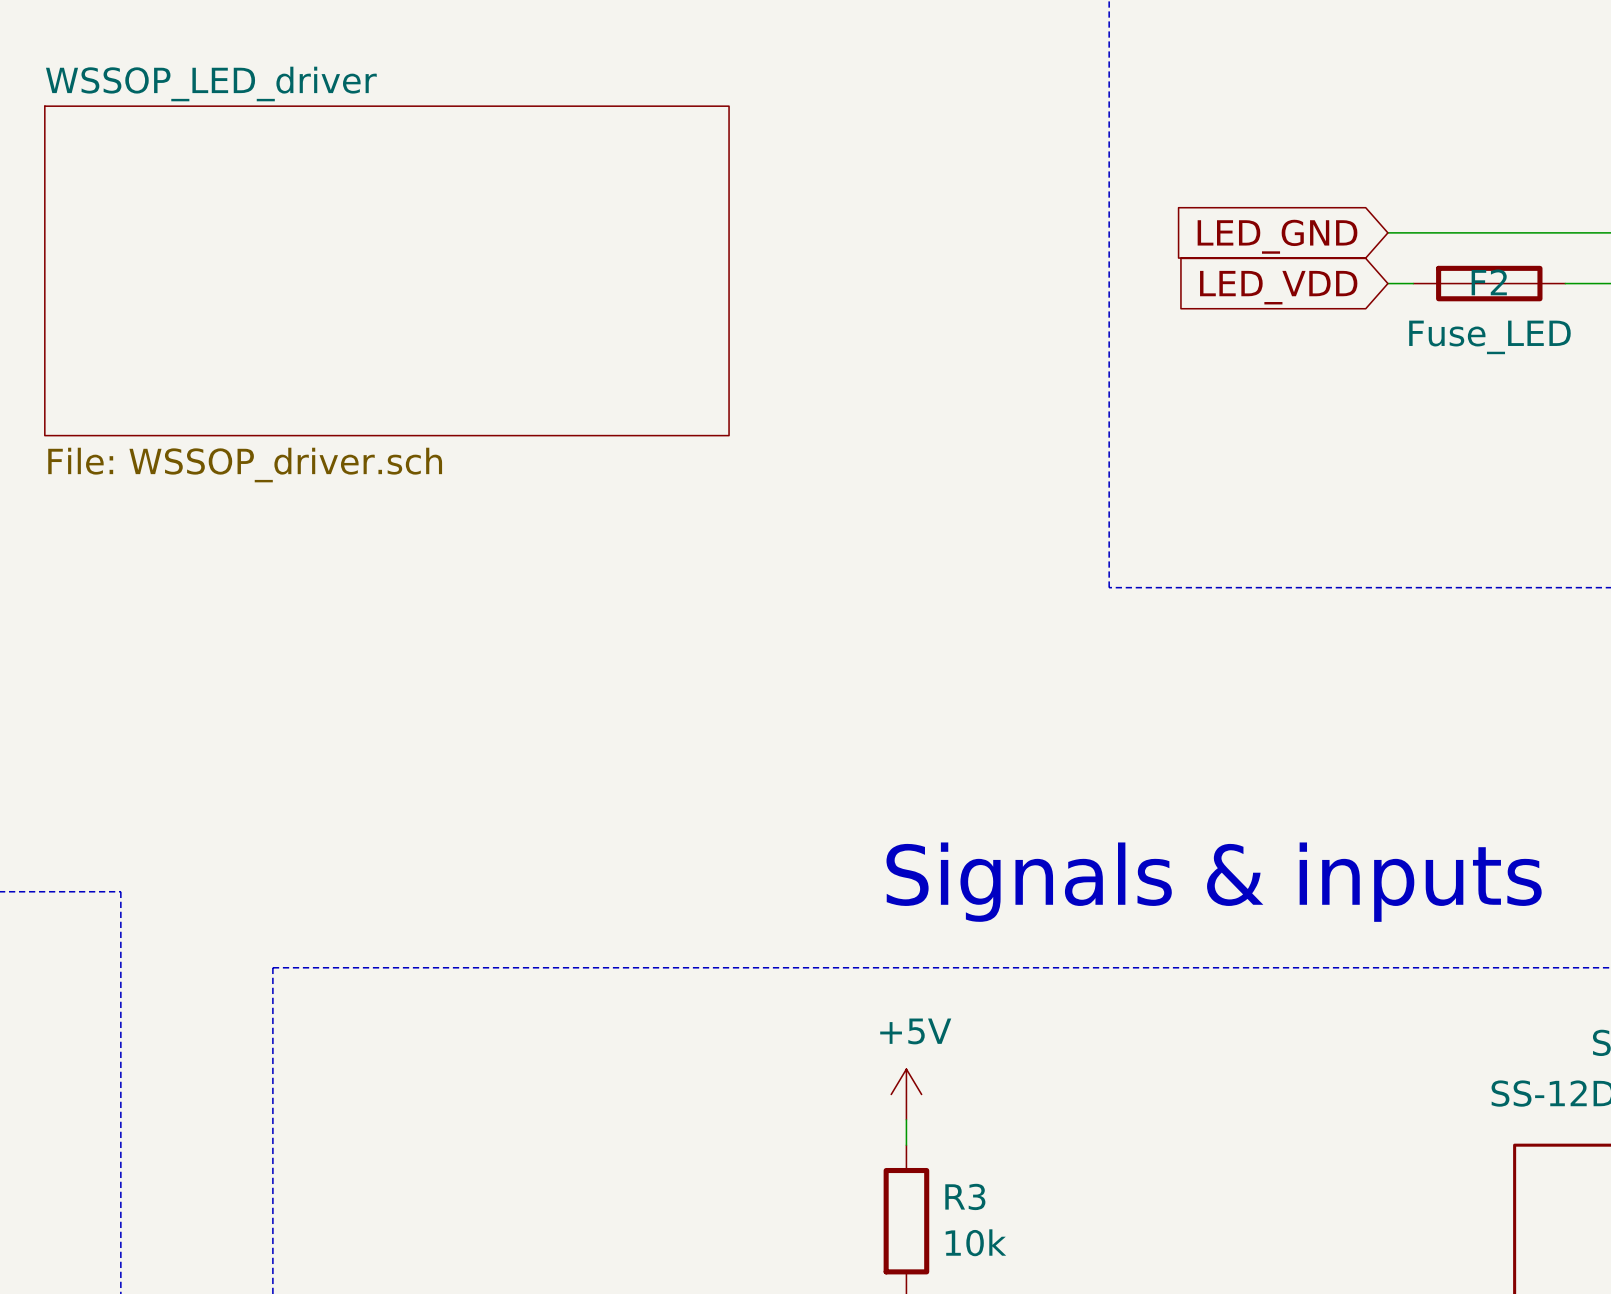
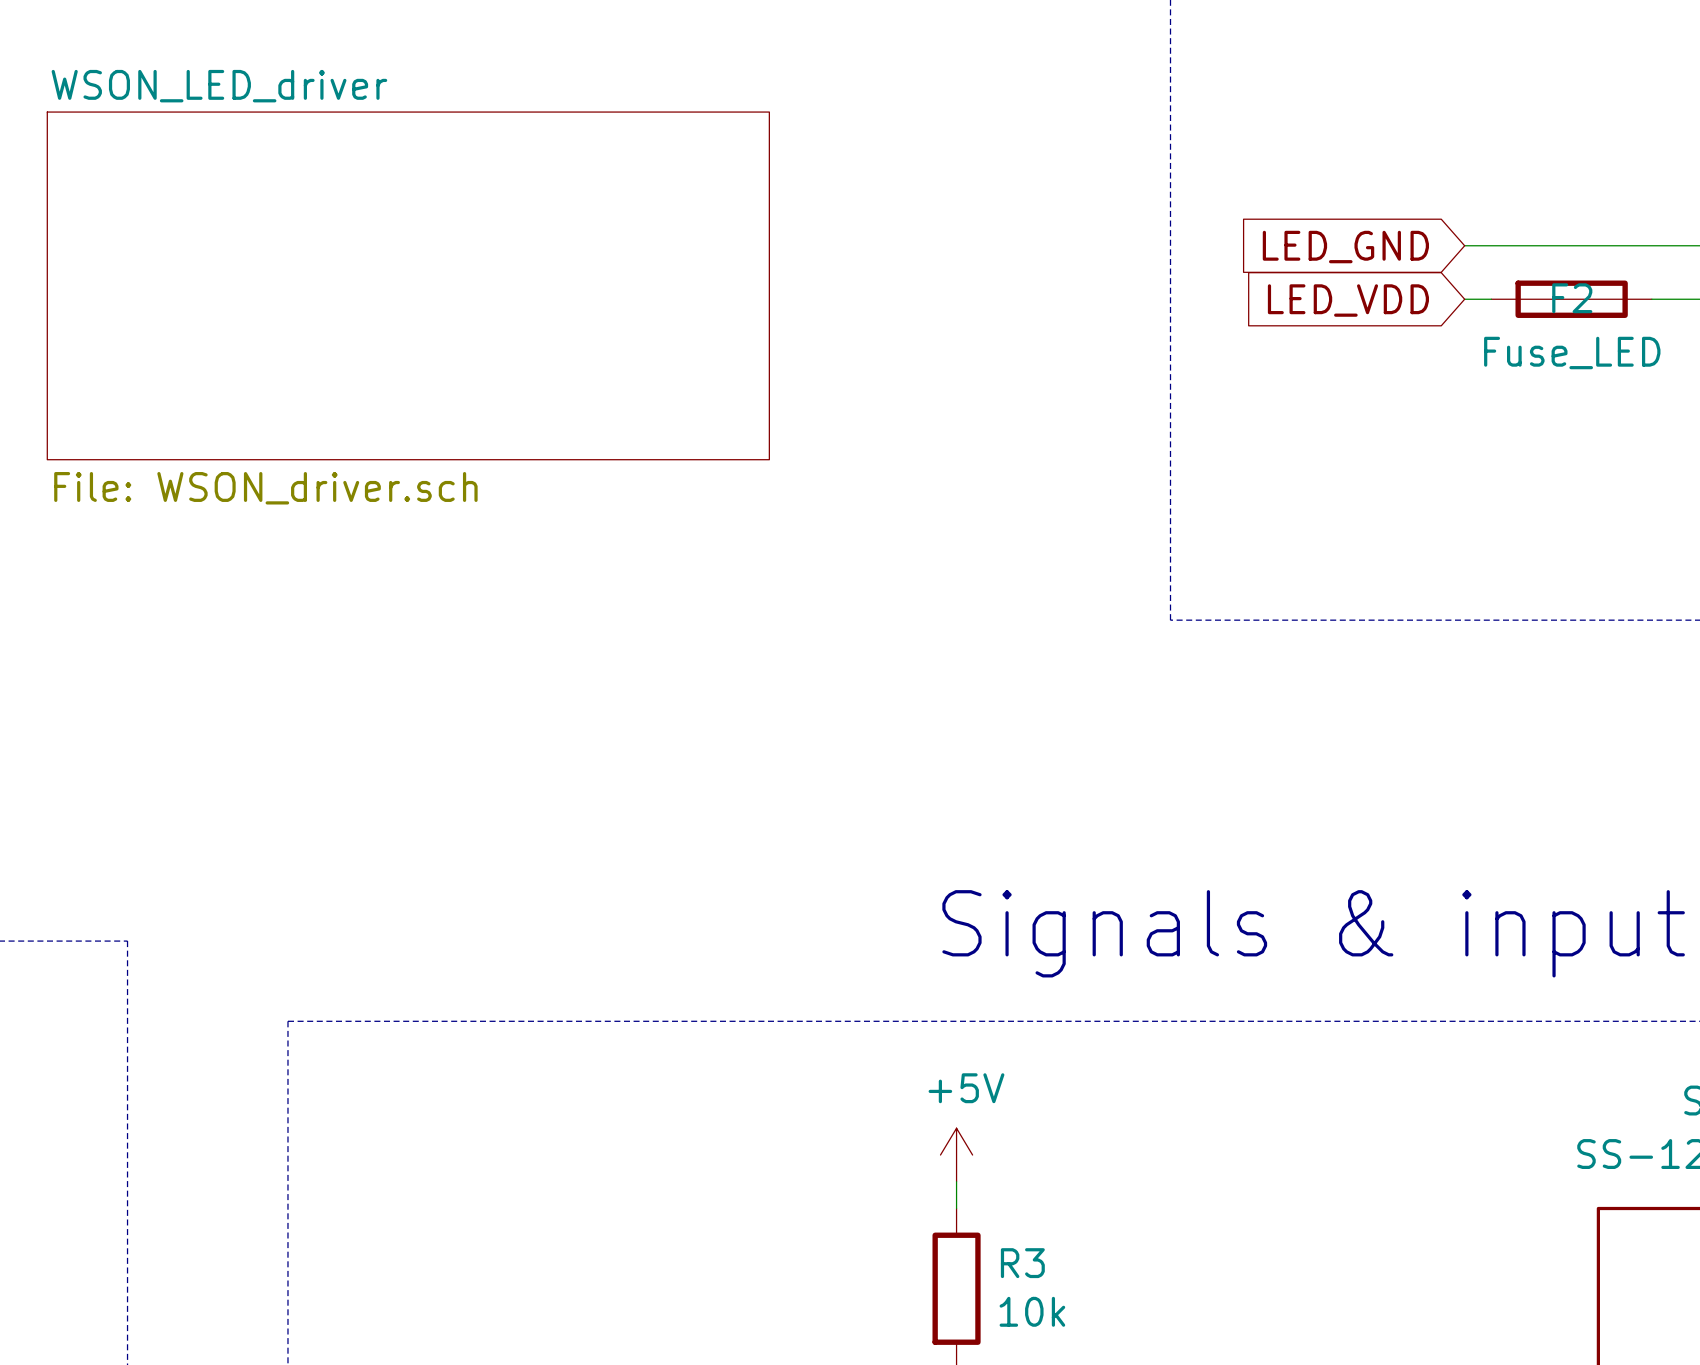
sheet WSSOP_LED_driver name: WSSOP_LED_driver (211, 83) -> WSON_LED_driver (219, 86)
sheet WSSOP_LED_driver value: File: WSSOP_driver.sch (245, 465) -> File: WSON_driver.sch (265, 488)

